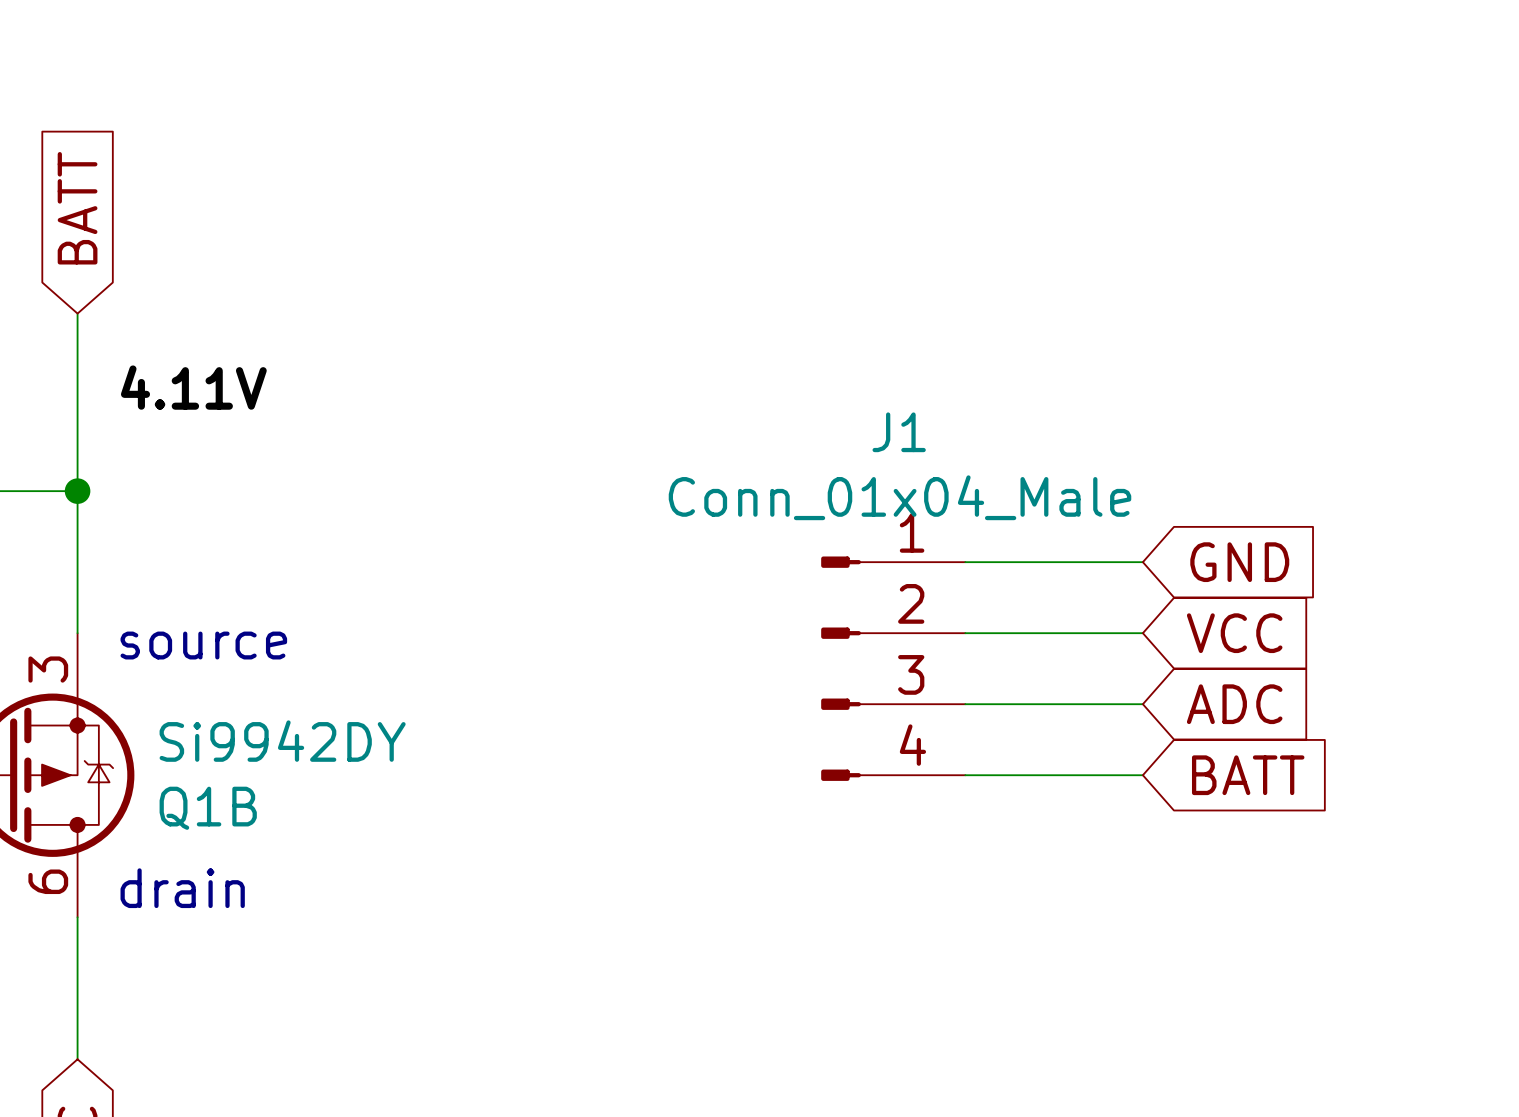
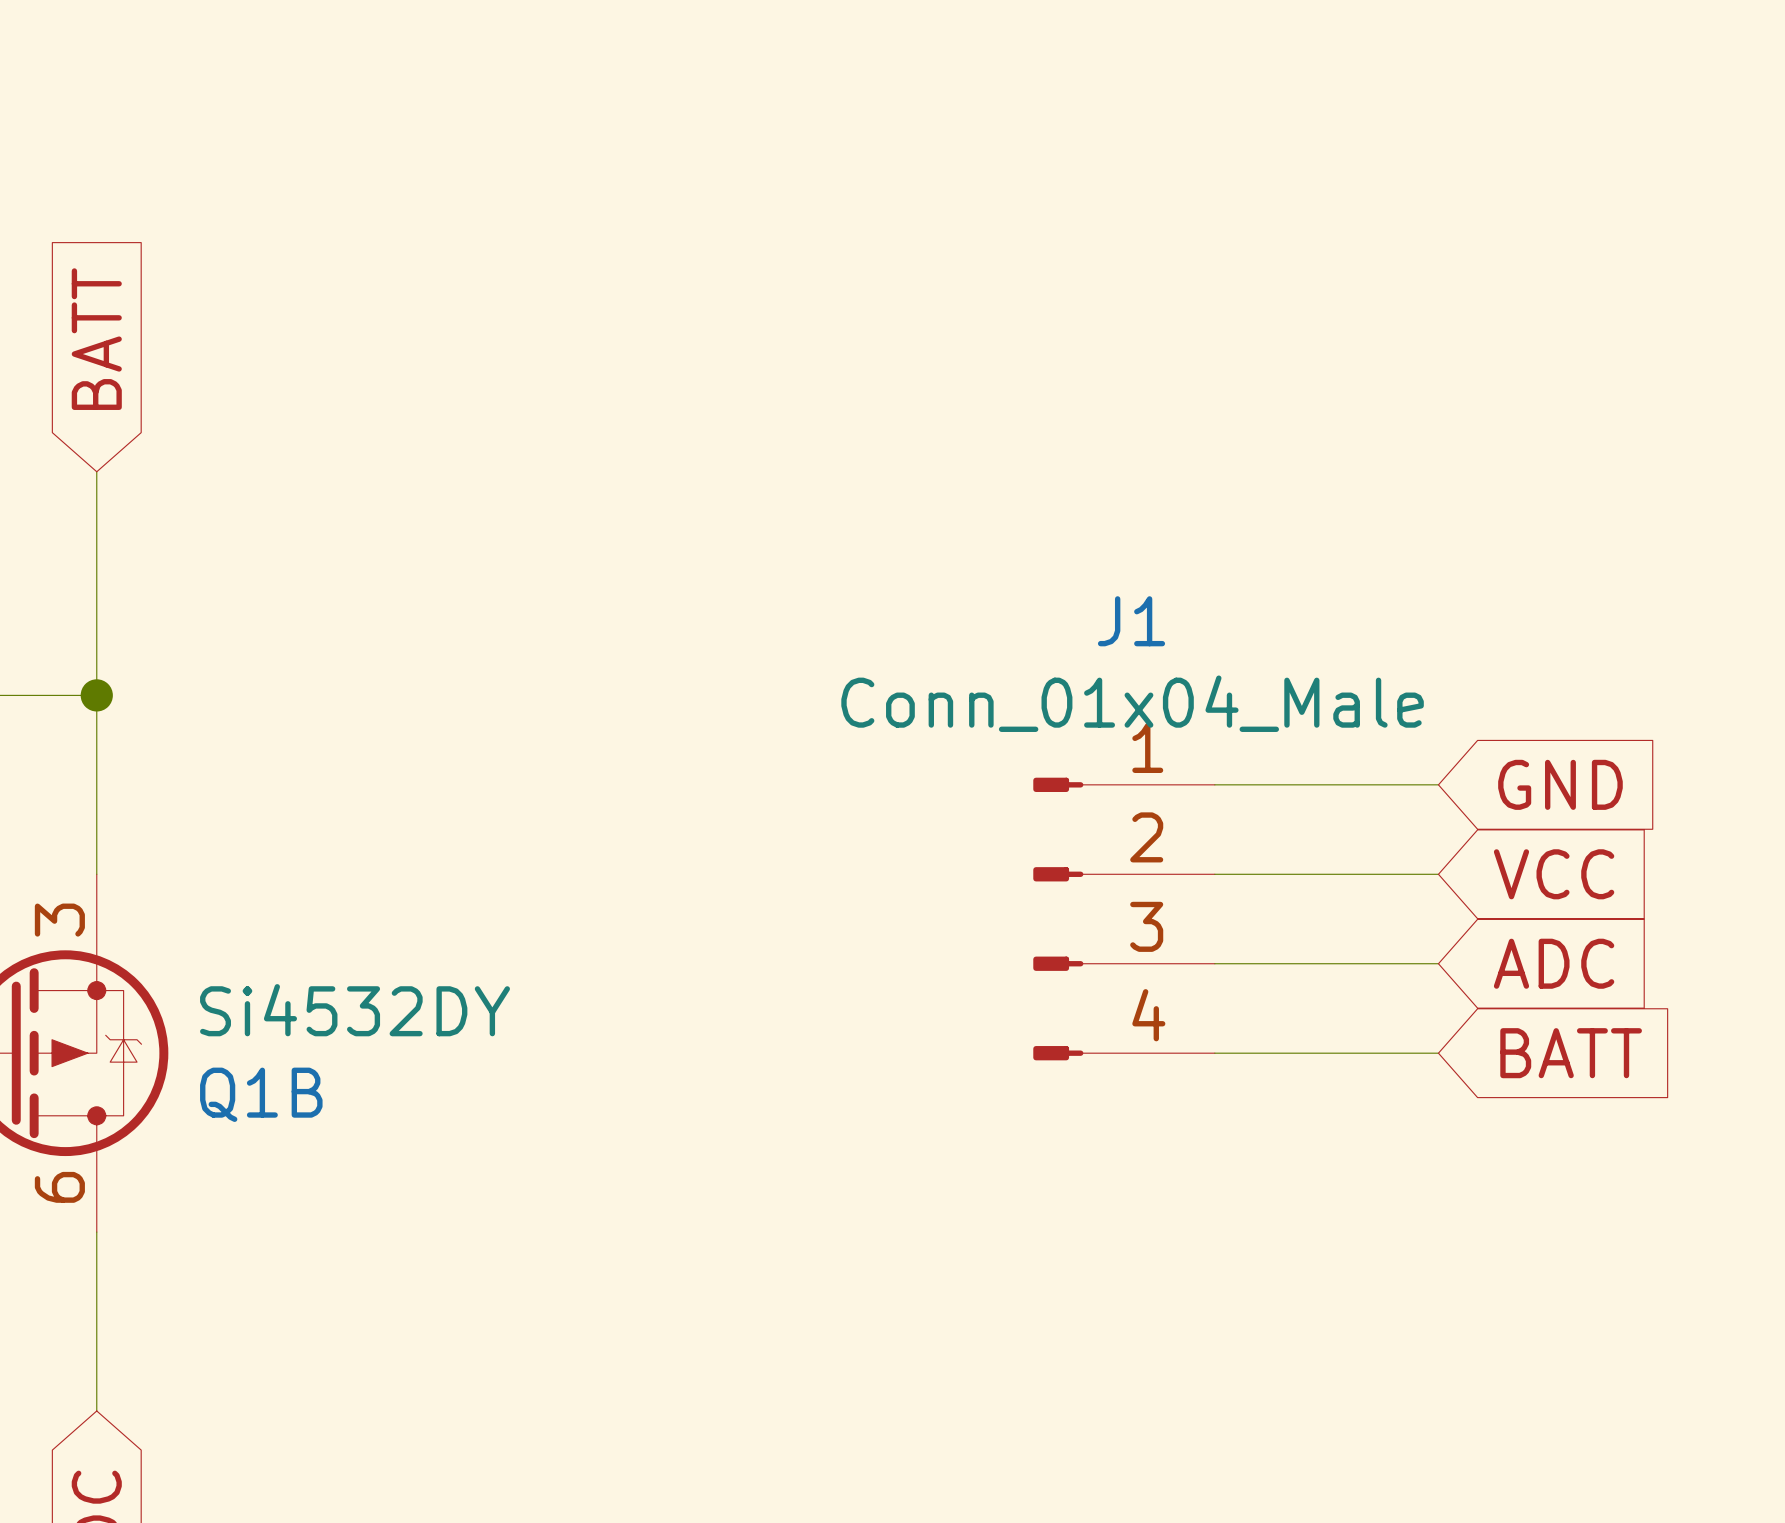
label: 4.11V (193, 387) -> none
text: source (203, 645) -> none
Q1B value: Si9942DY (282, 741) -> Si4532DY (355, 1010)
text: drain (182, 888) -> none

